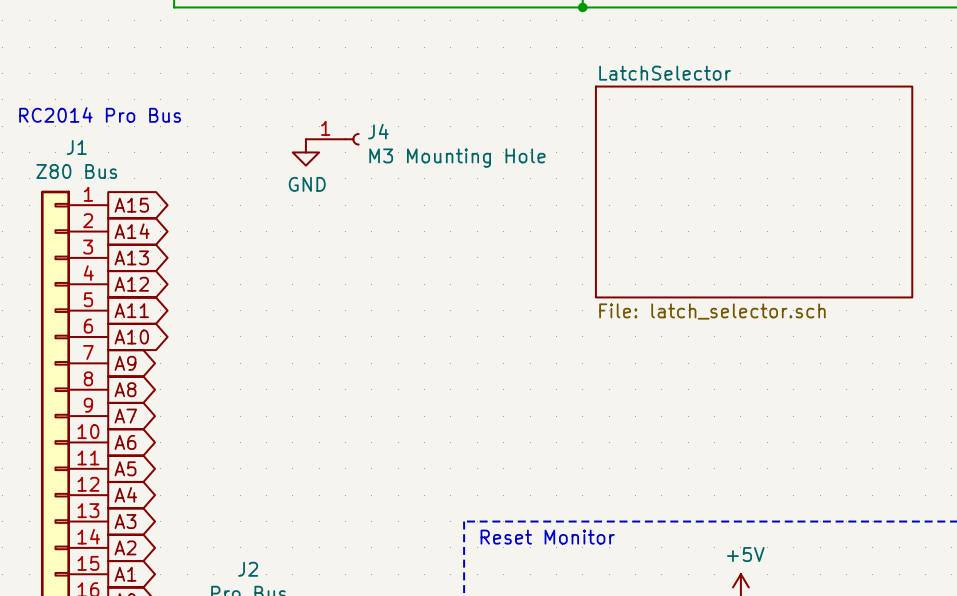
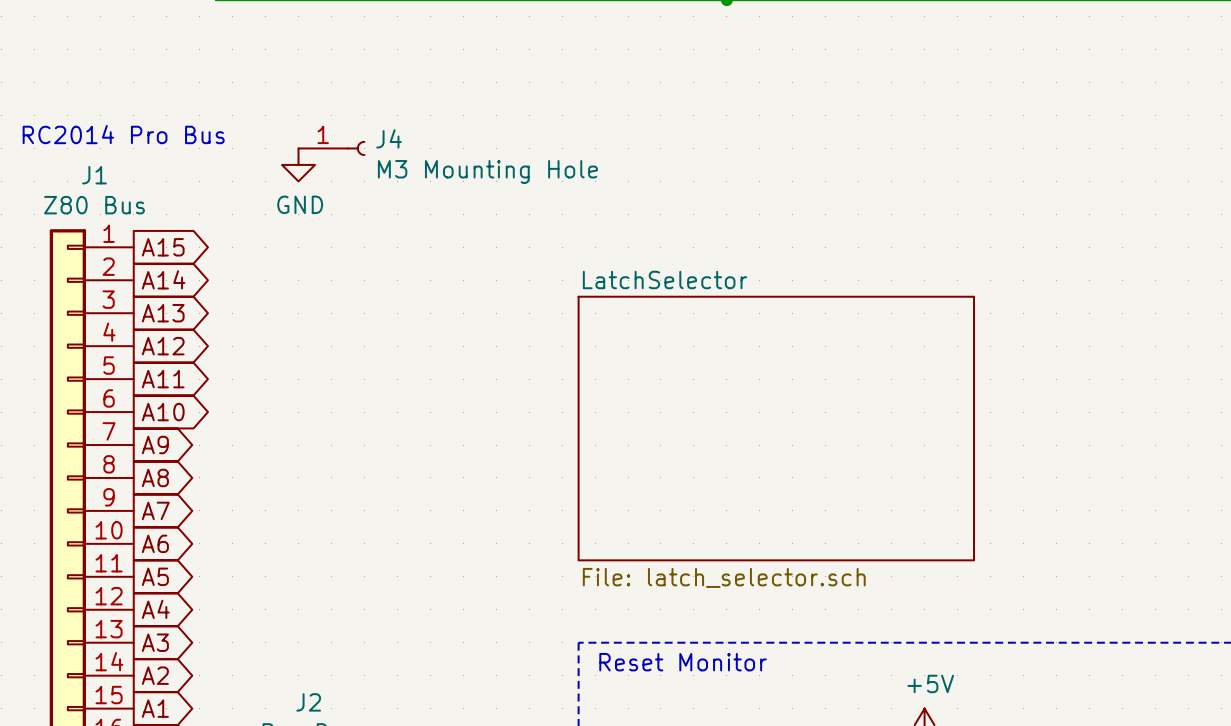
J4 position: (332, 139) -> (331, 148)
power symbol position: GND (305, 152) -> GND (298, 164)
sheet LatchSelector position: (754, 192) -> (776, 428)

